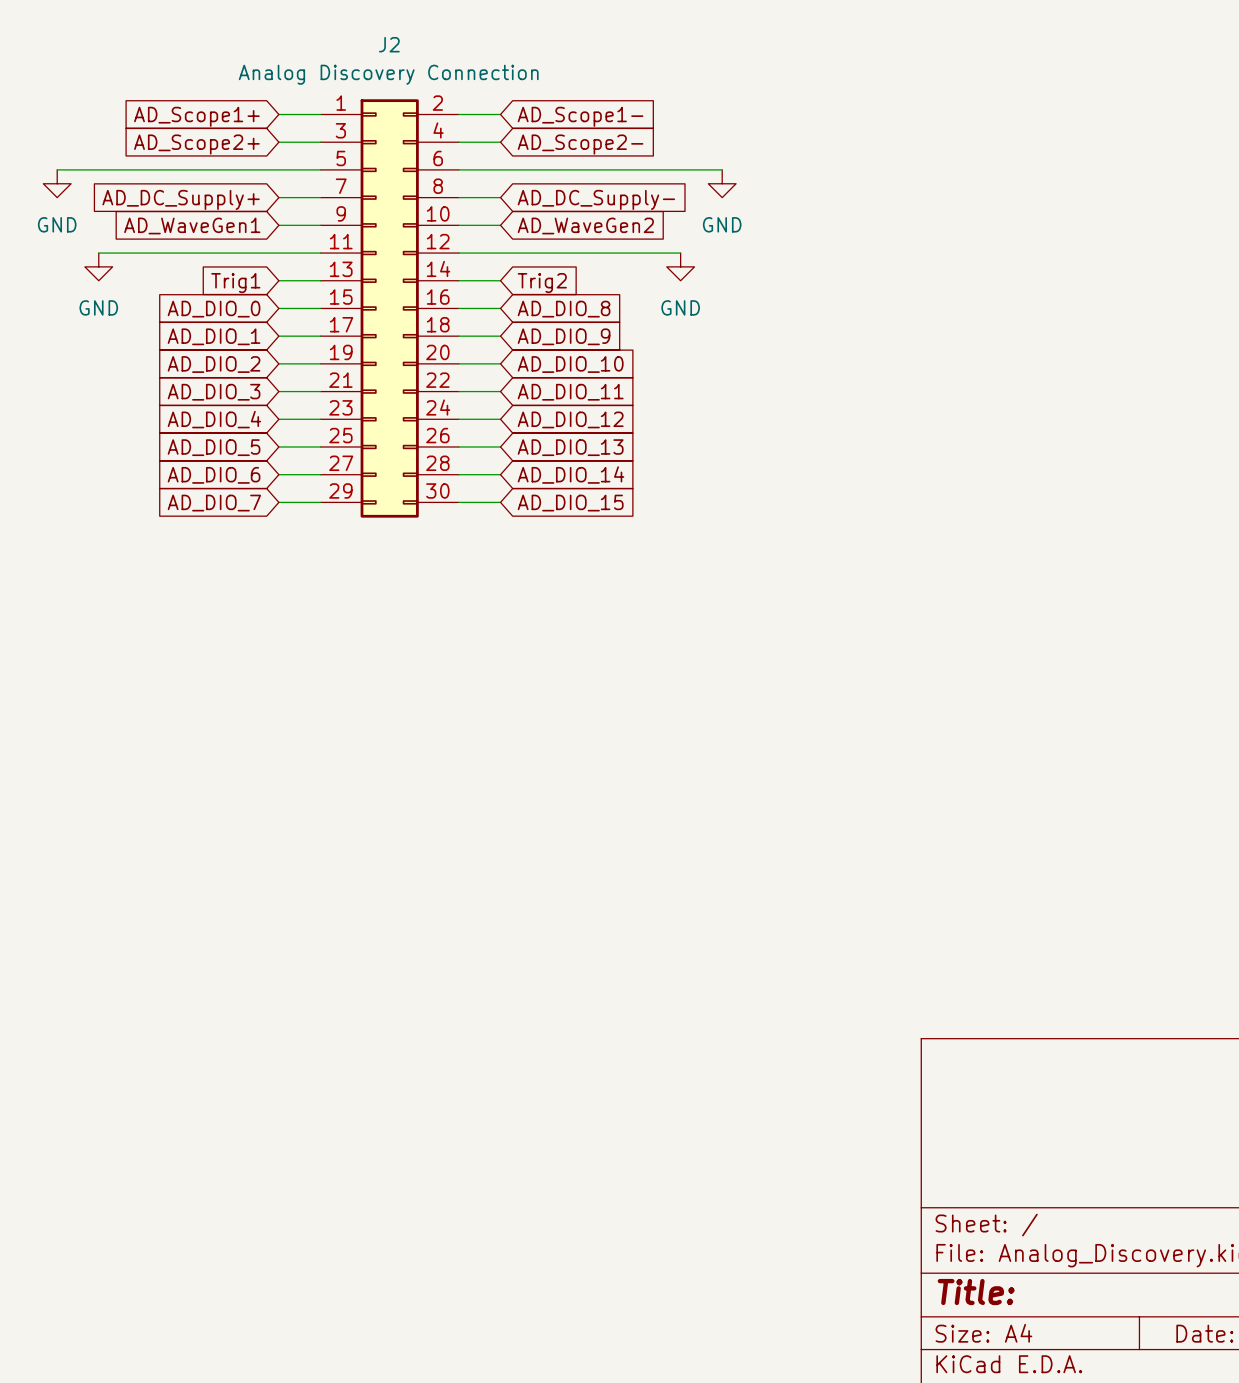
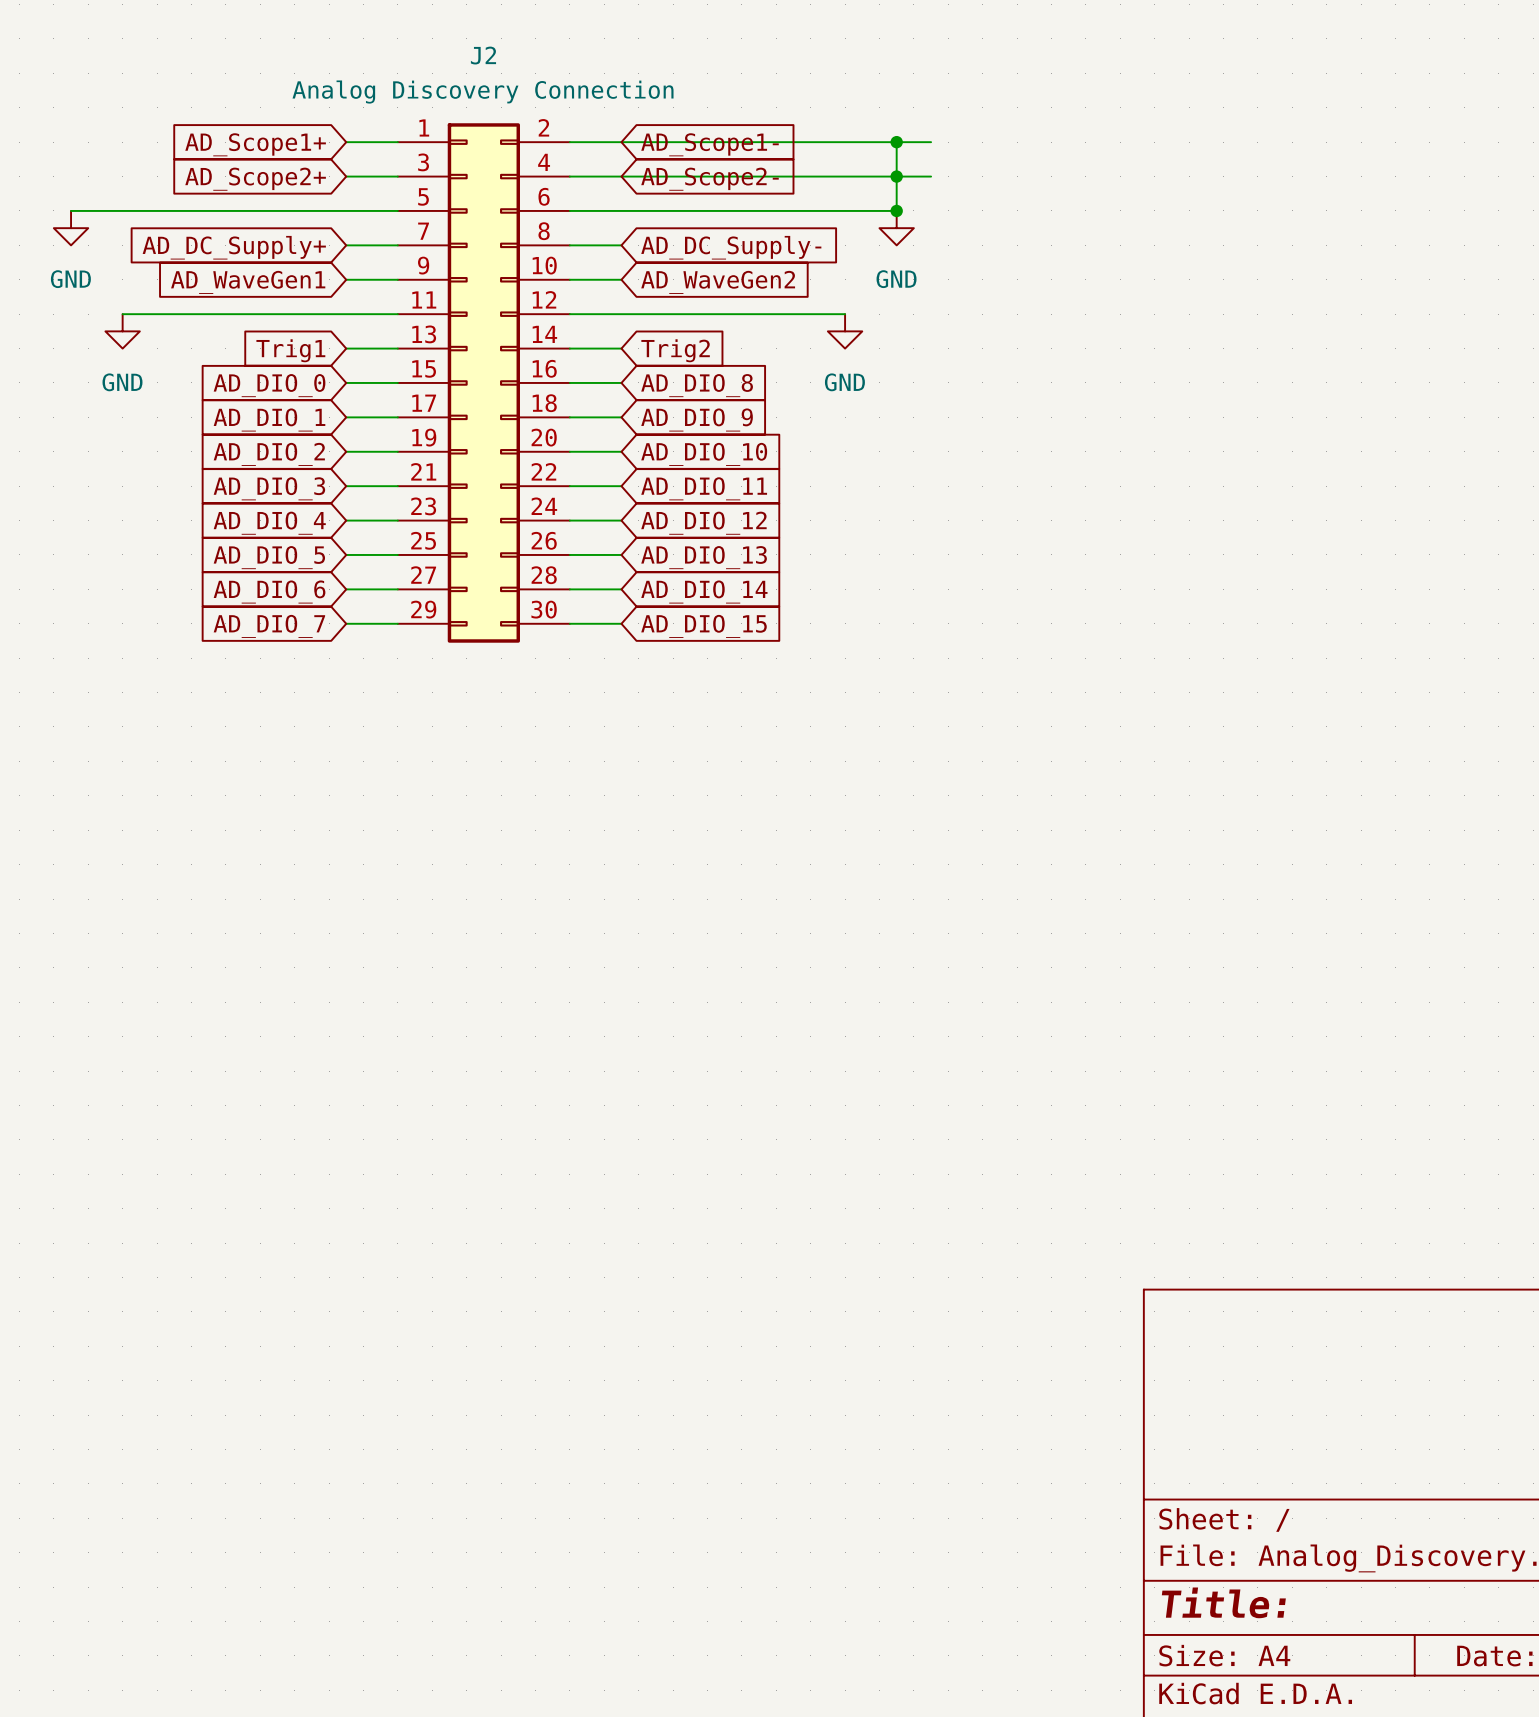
wire: none -> (621, 142) (931, 142)
wire: none -> (896, 142) (896, 210)
junction: none -> (896, 142)
wire: none -> (621, 176) (931, 176)
junction: none -> (896, 176)
junction: none -> (896, 210)

